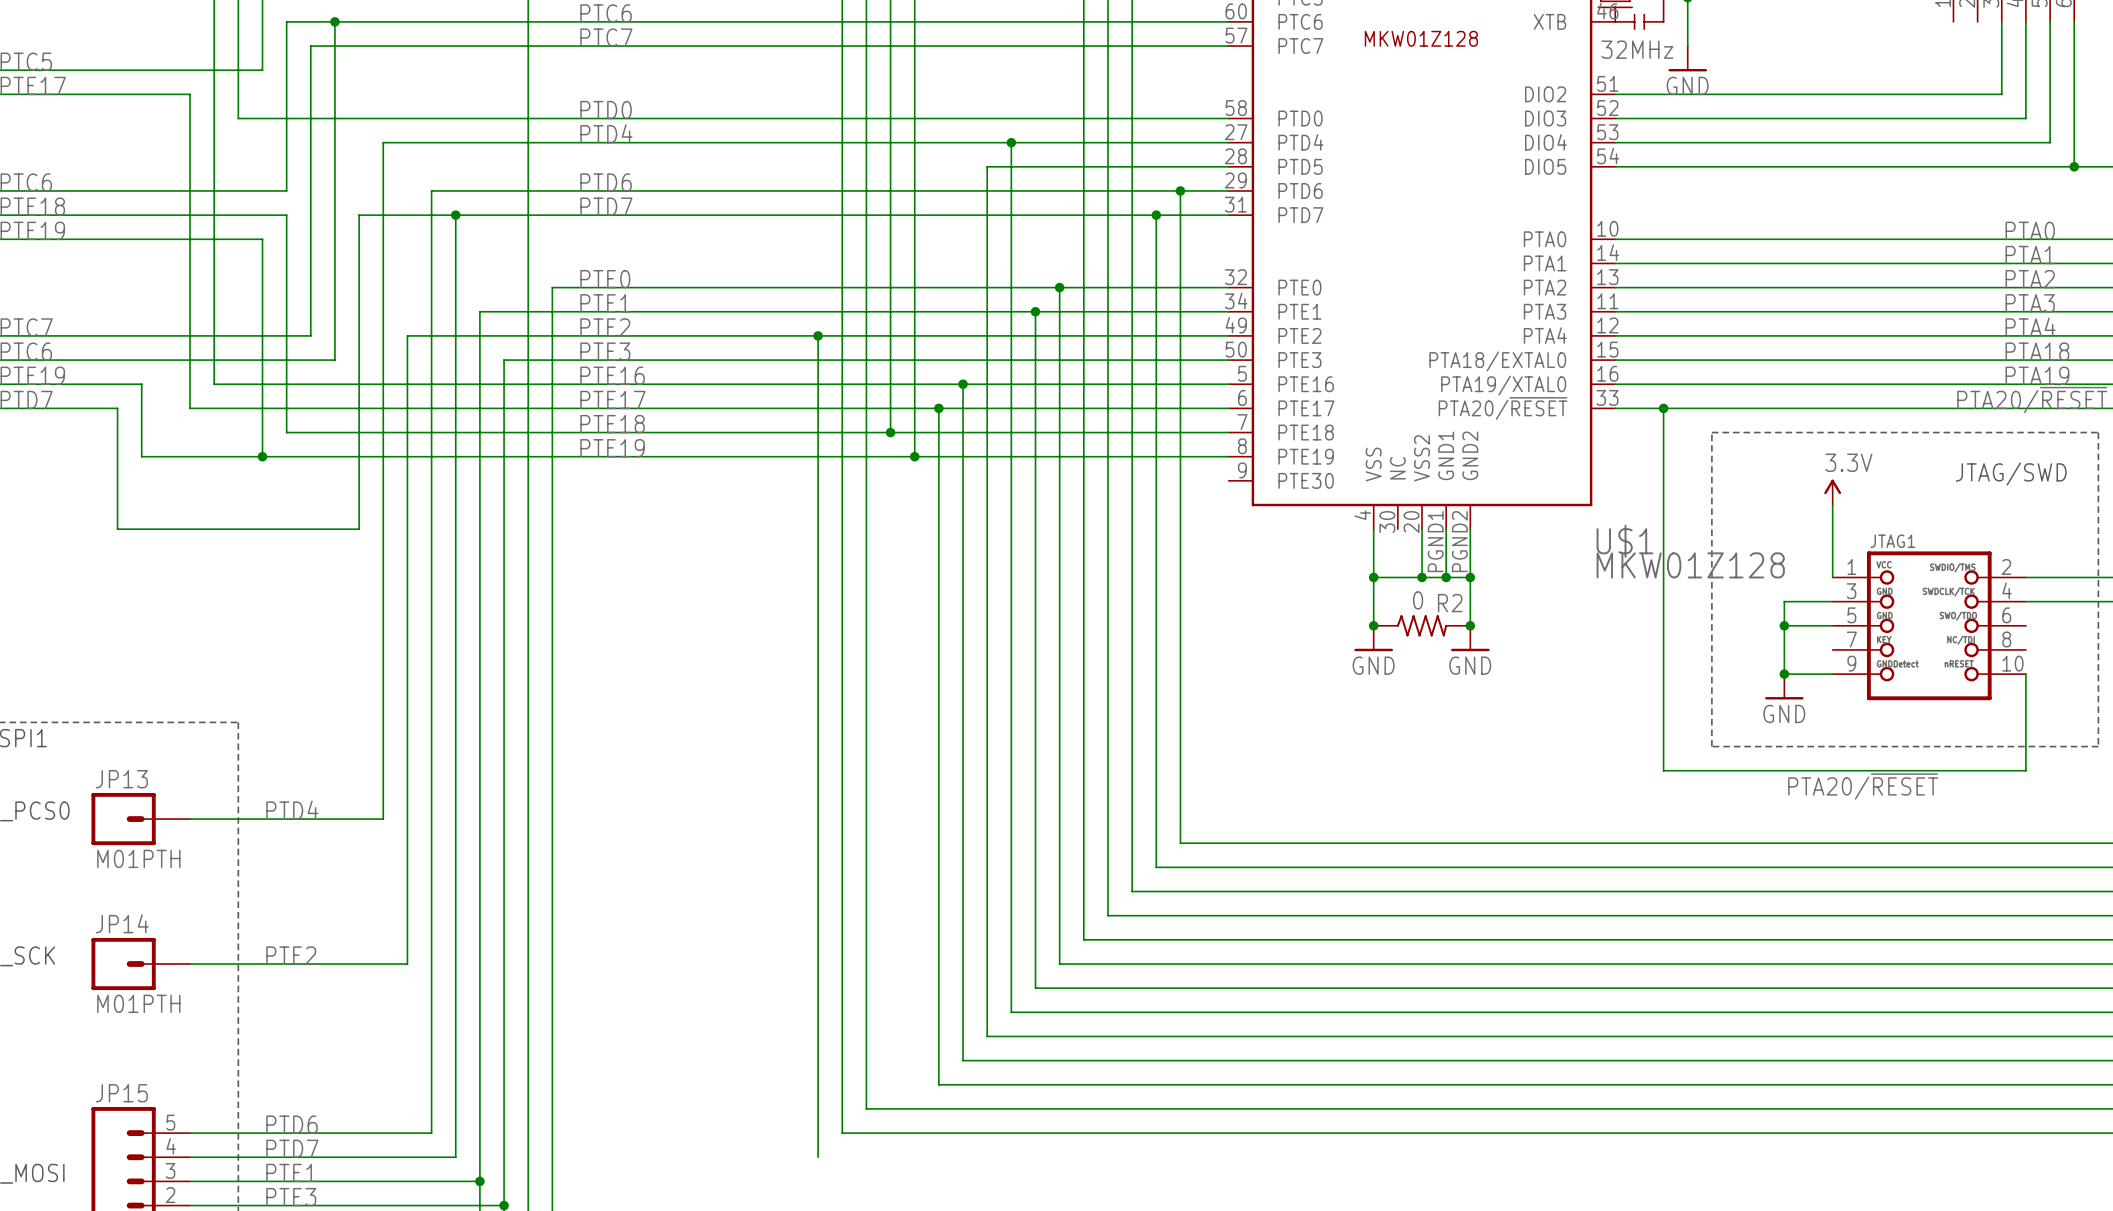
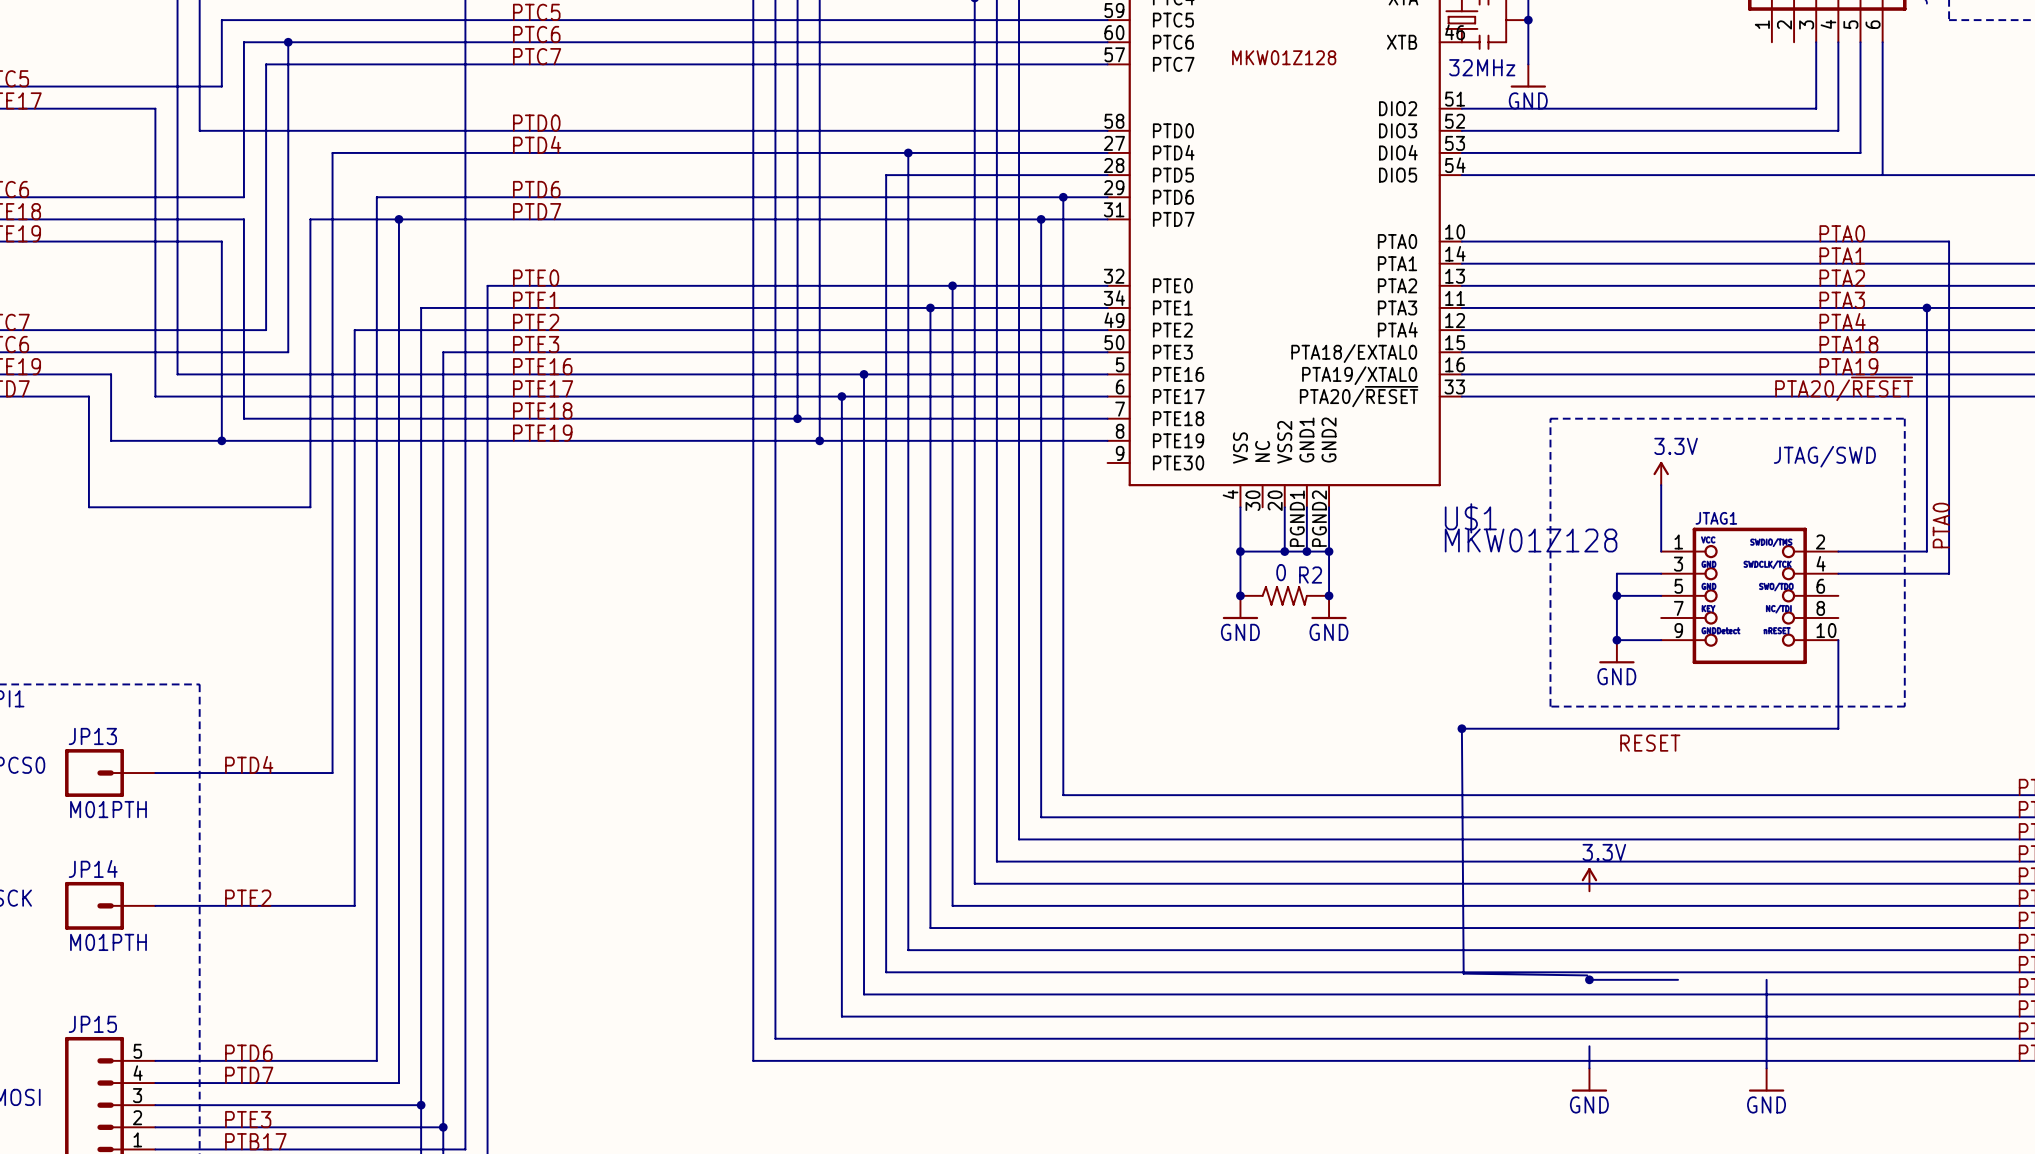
junction: (2074, 166) -> none
wire: (818, 335) (818, 1157) -> none
junction: (818, 335) -> none
wire: (1663, 408) (1663, 770) -> (1587, 975) (1463, 973) (1461, 728) (1506, 728)
junction: (1663, 408) -> none
junction: none -> (1461, 728)
label: PTA20/~{RESET} (1863, 786) -> RESET (1650, 743)
power symbol: none -> 3.3V (1589, 879)
wire: none -> (1589, 979) (1678, 979)
junction: none -> (1589, 979)
wire: none -> (1766, 979) (1766, 1068)
wire: none -> (1589, 1046) (1589, 1068)
power symbol: none -> GND (1589, 1080)
power symbol: none -> GND (1766, 1080)
label: PTE1 (291, 1172) -> none

